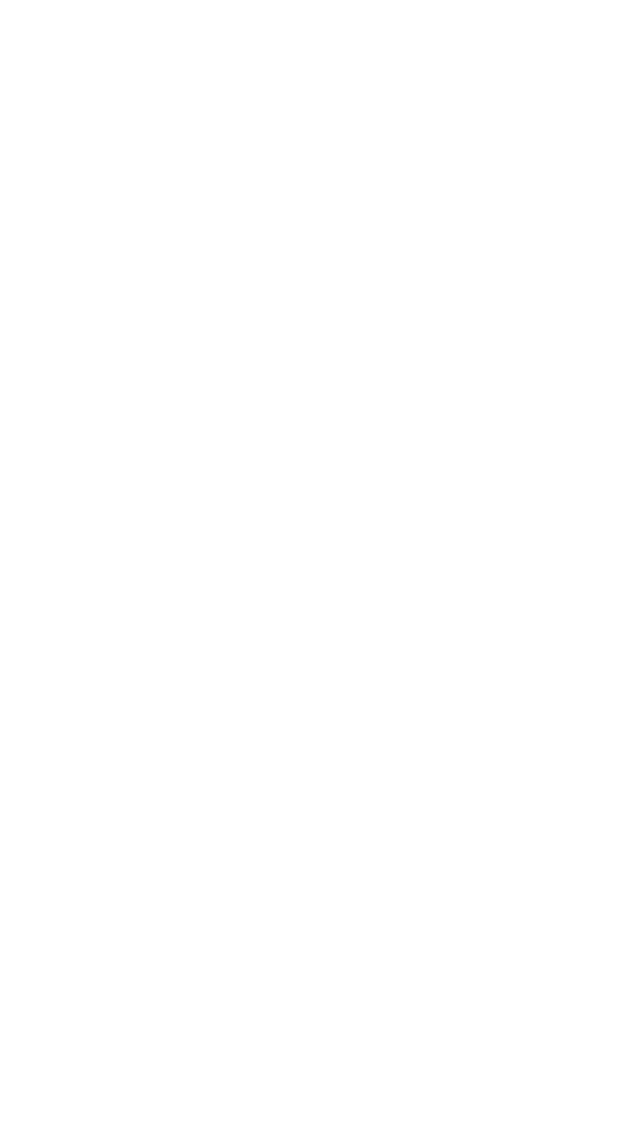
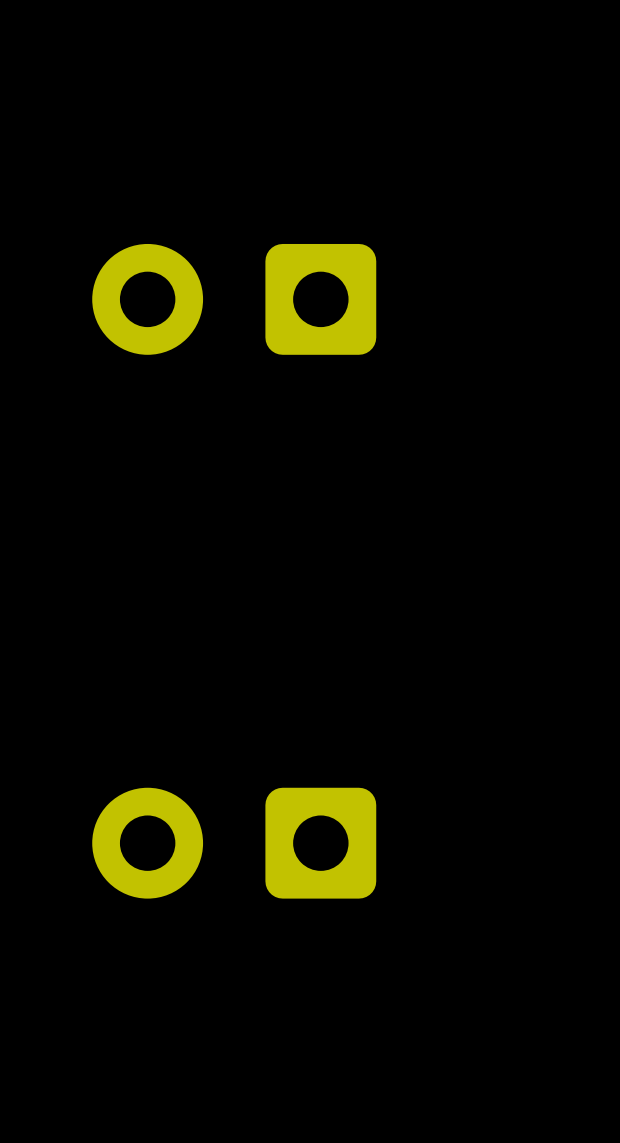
part: none -> (234, 299)
part: none -> (234, 843)

